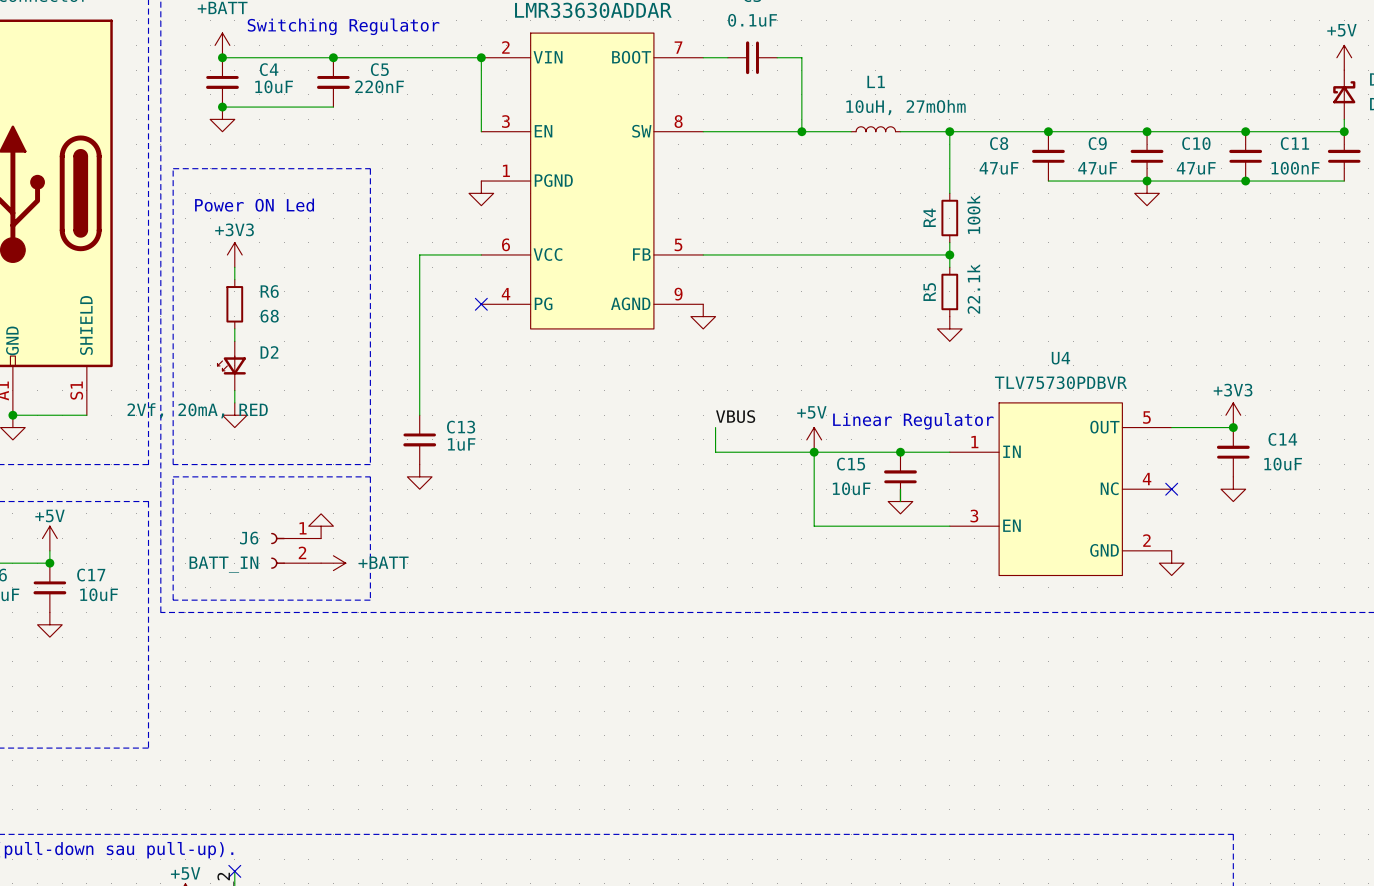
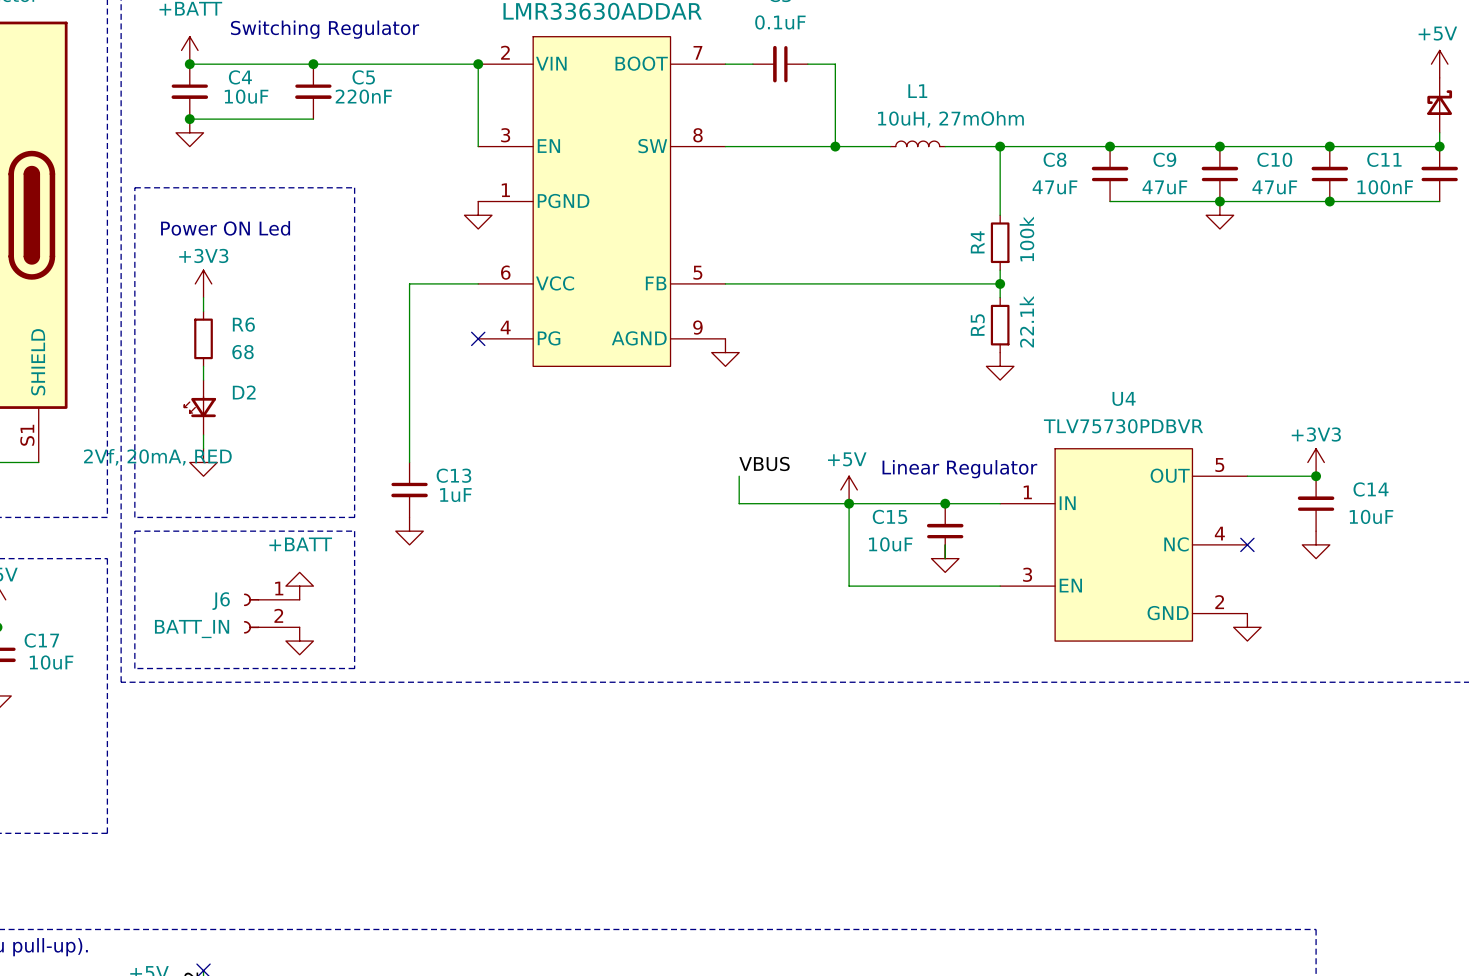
power symbol text: none -> +BATT (300, 544)
power symbol: +BATT (333, 563) -> none
power symbol: none -> (299, 641)

